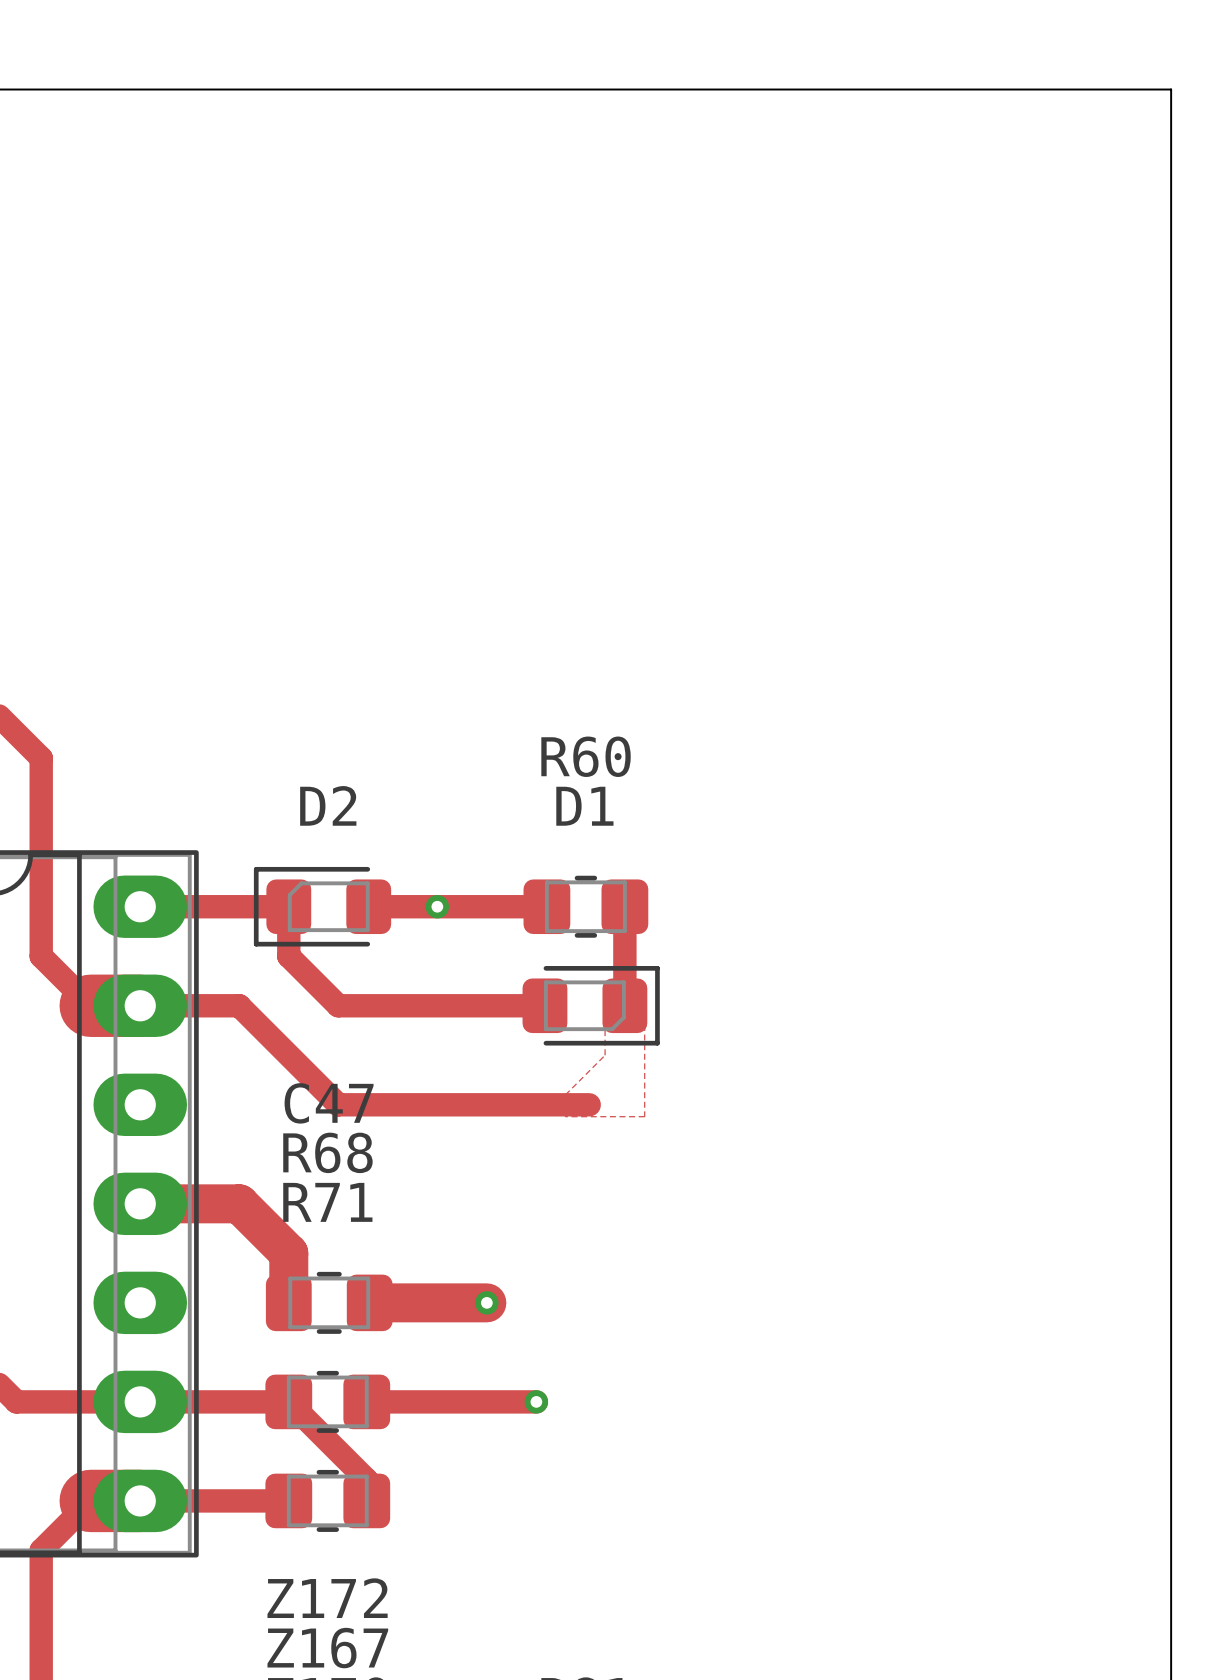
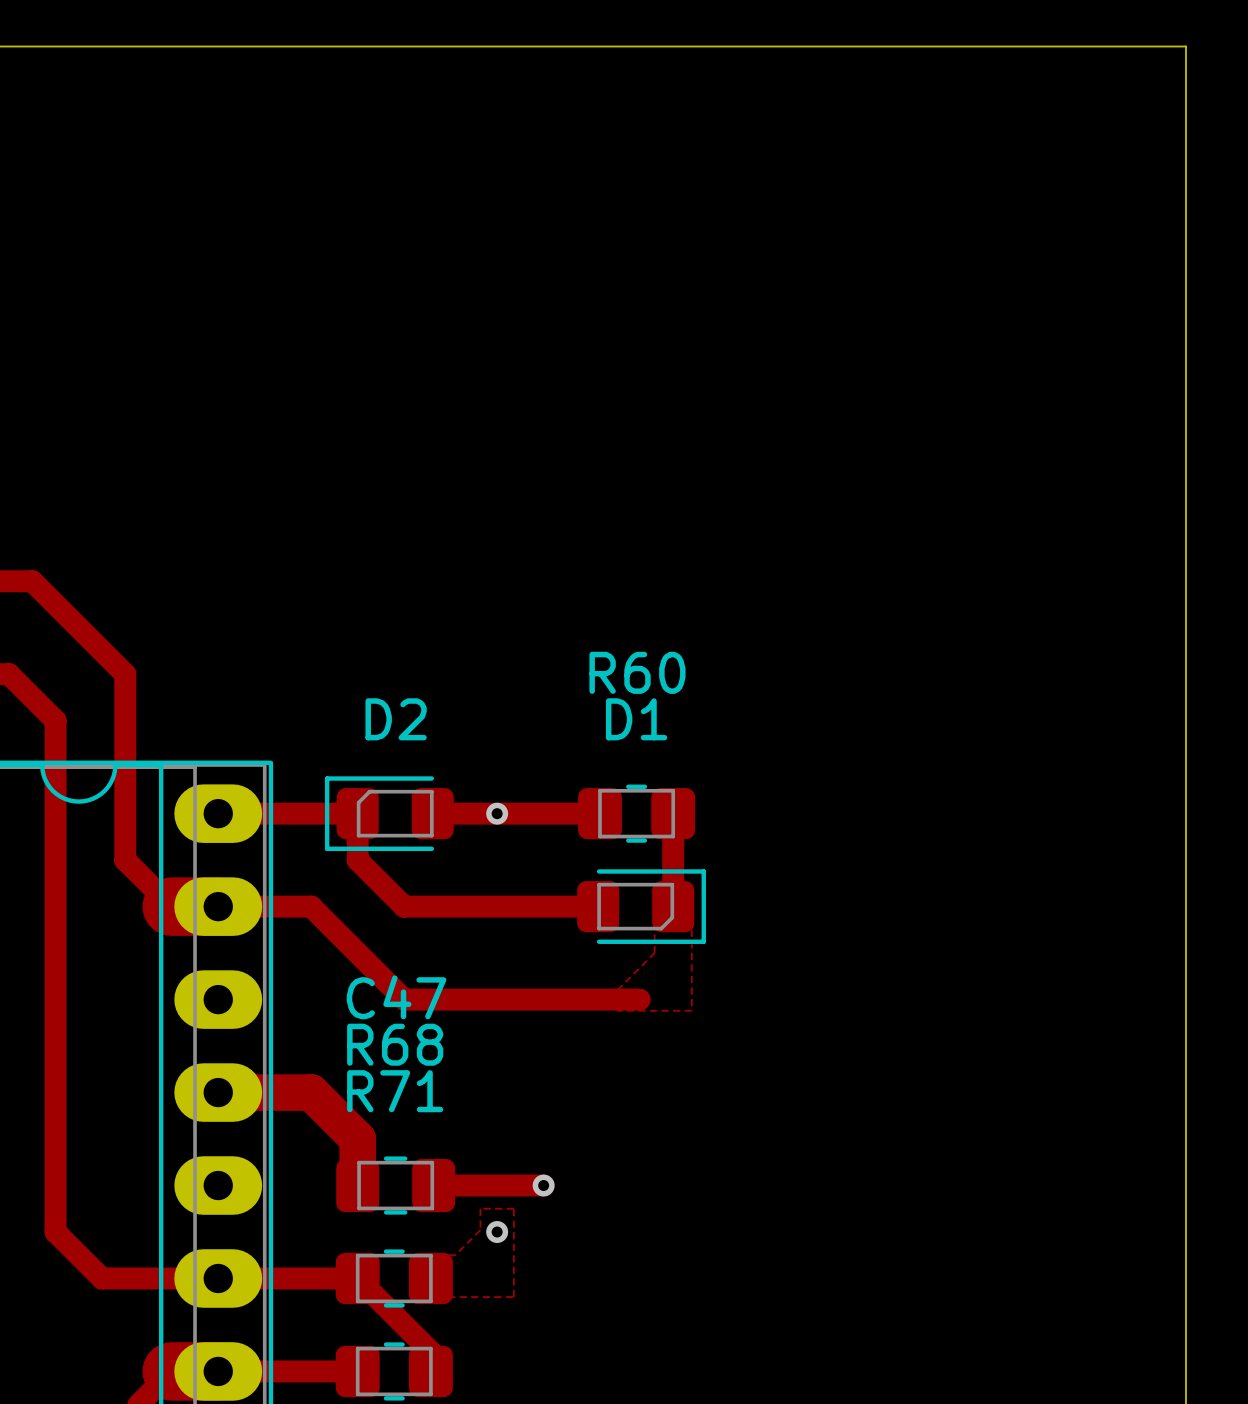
track width: thick (369, 1302) (486, 1302) -> thin (433, 1185) (543, 1185)
zone outline: none -> (480, 1208) (513, 1208) (513, 1297) (413, 1297) (413, 1255) (455, 1255) (480, 1230) (480, 1208)
track: (366, 1401) (536, 1401) -> none
via position: (536, 1401) -> (497, 1232)

